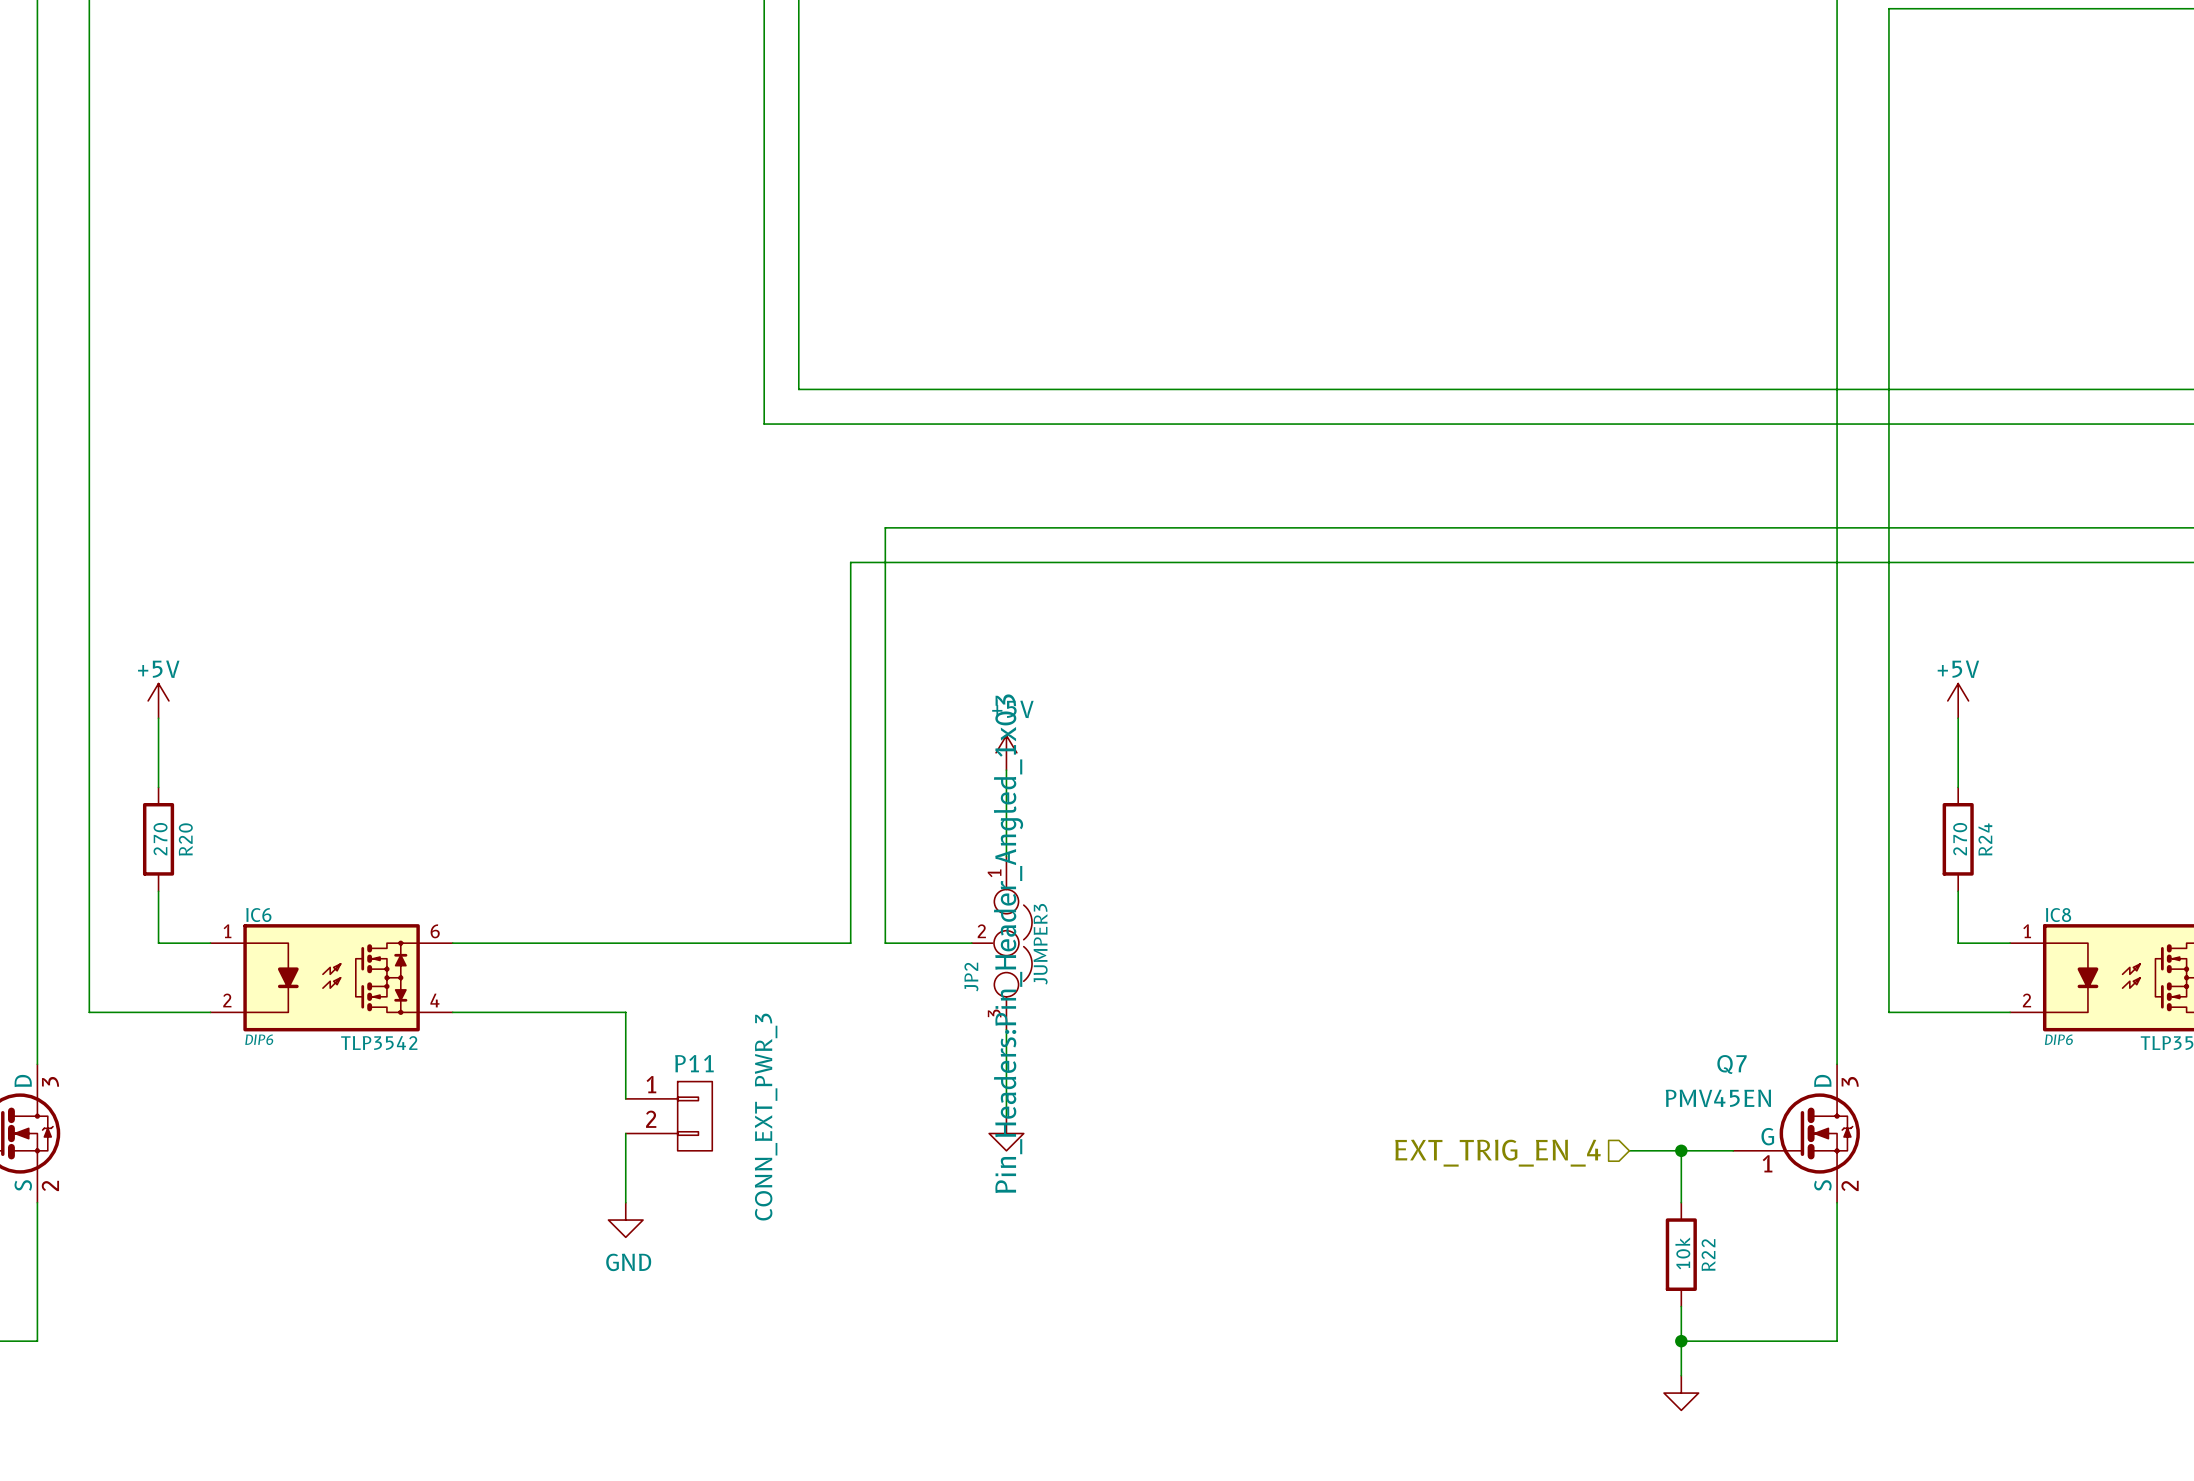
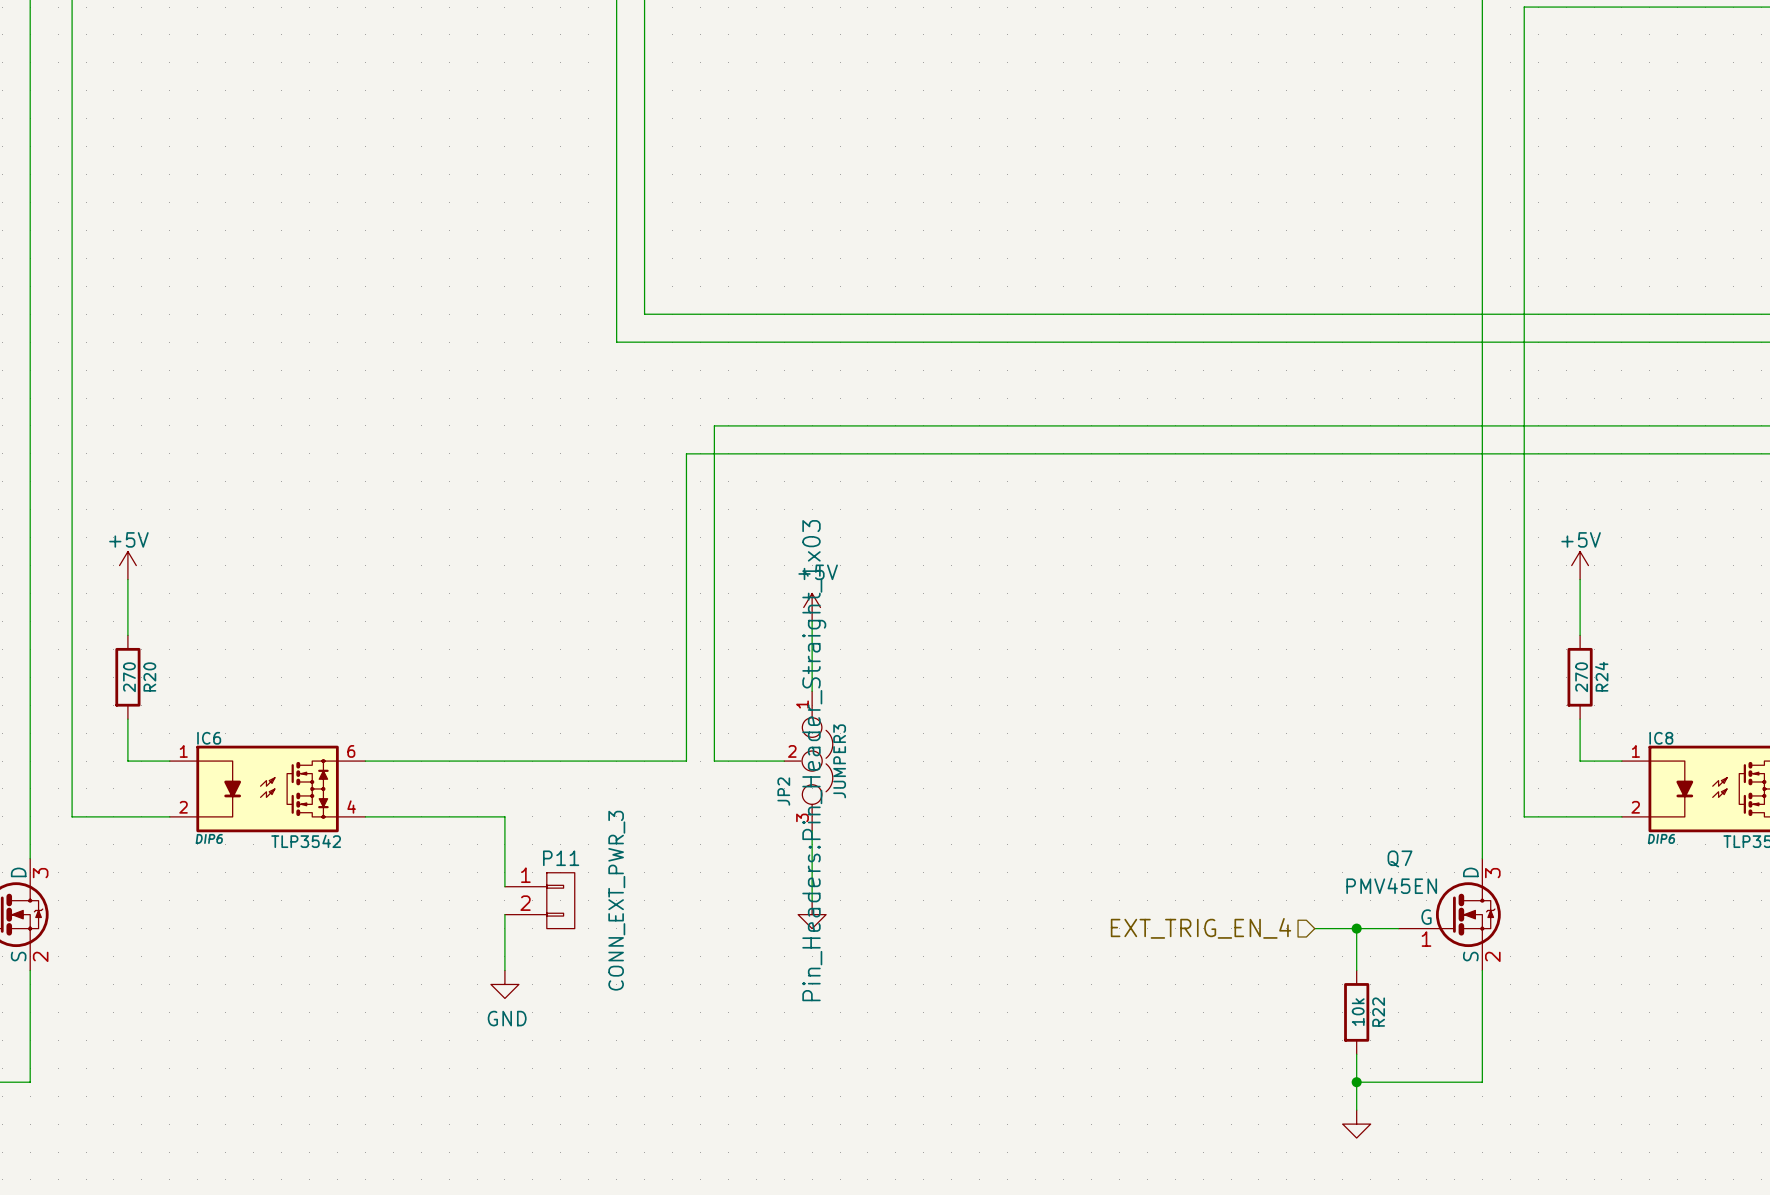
JP2 text: Pin_Headers:Pin_Header_Angled_1x03 (1008, 943) -> Pin_Headers:Pin_Header_Straight_1x03 (814, 760)

